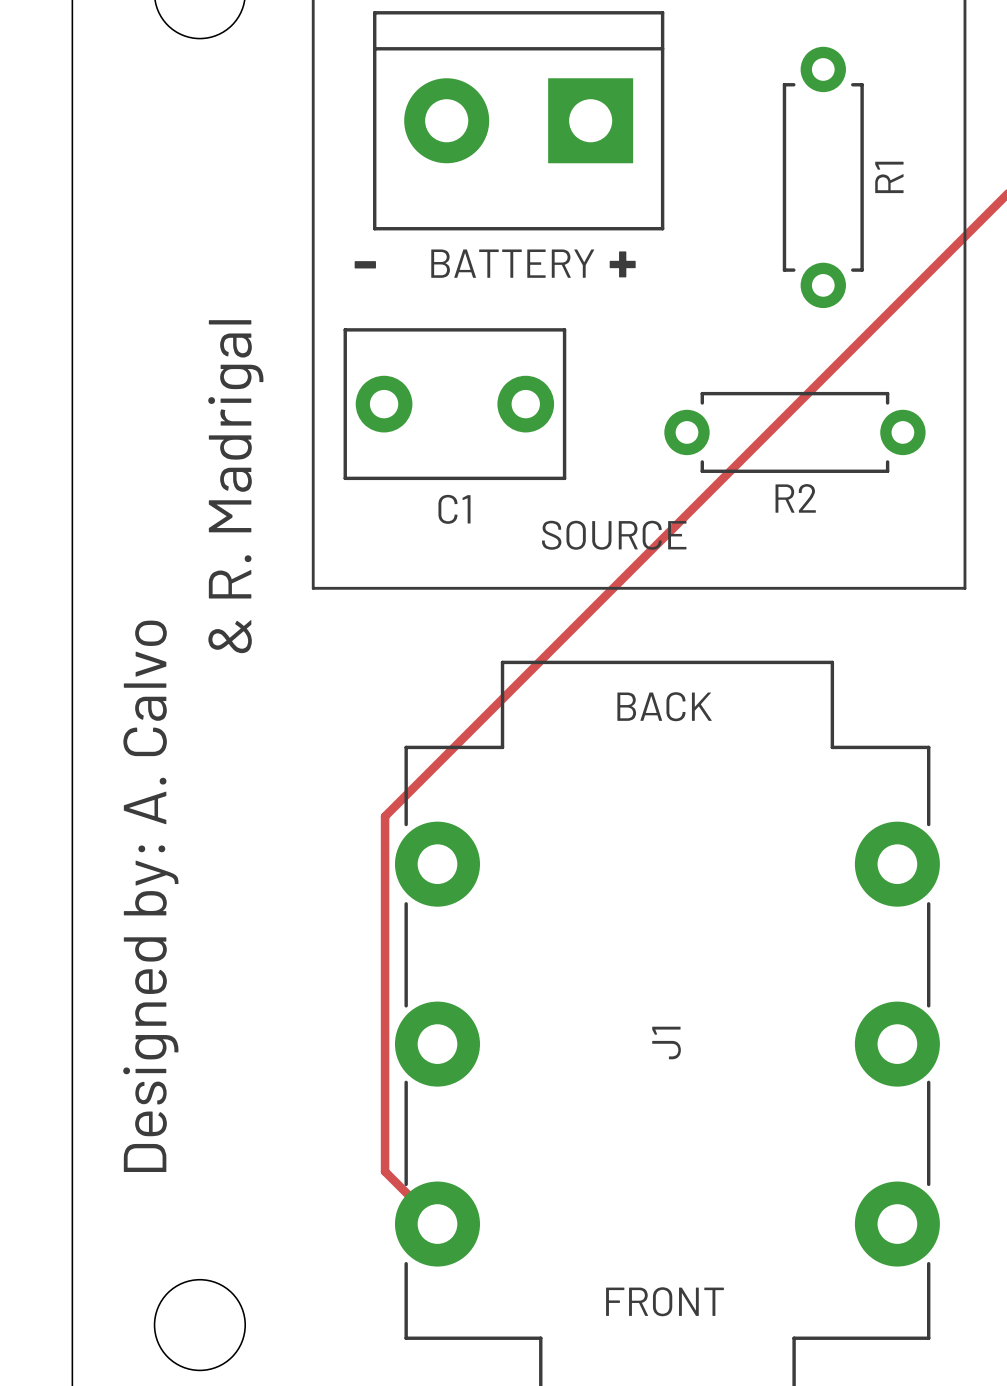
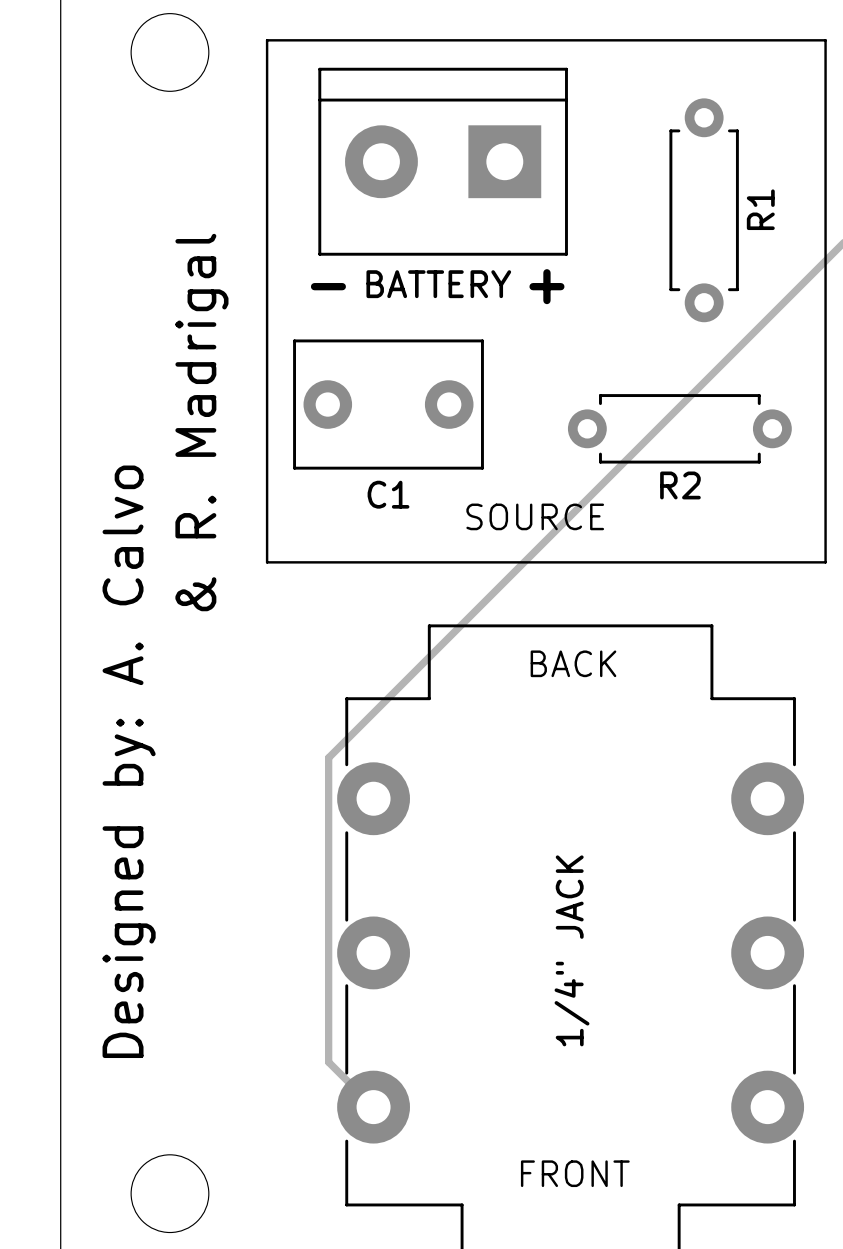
J1 name: J1 (666, 1042) -> 1/4" JACK (572, 950)

